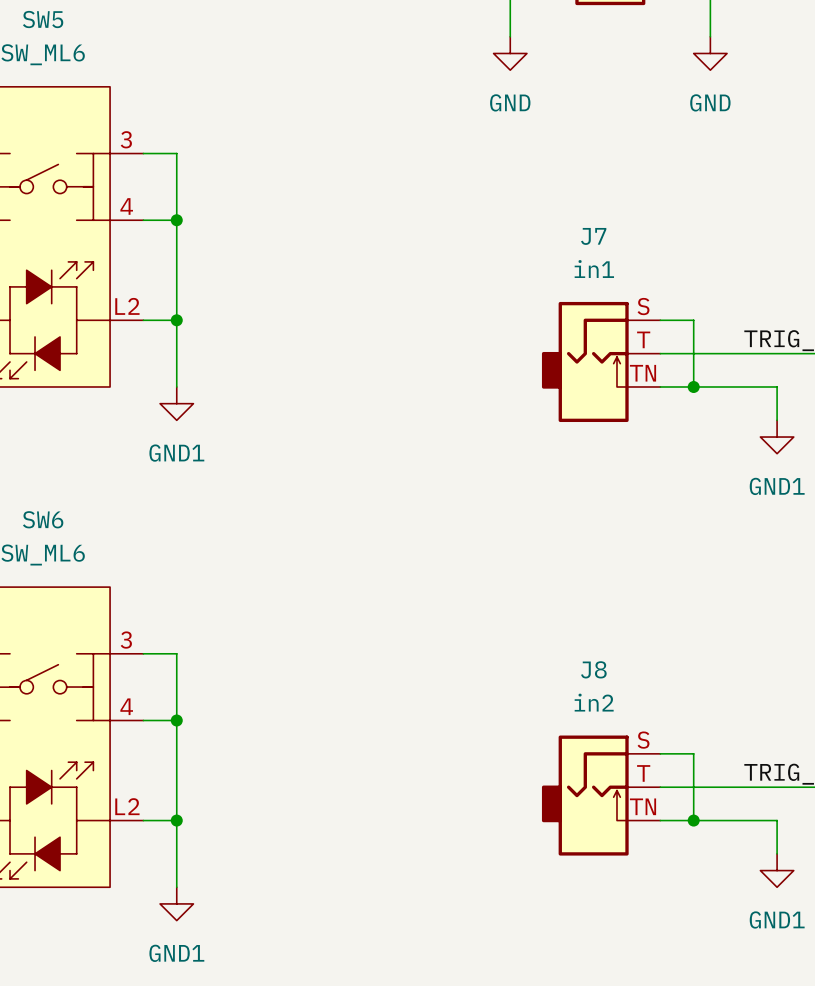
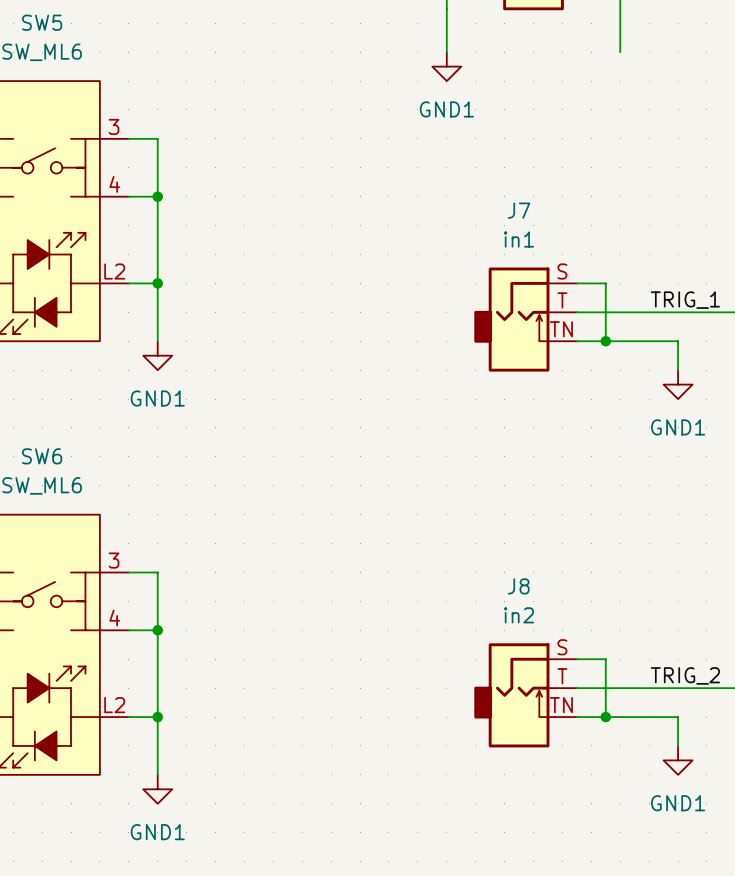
power symbol: GND (510, 53) -> none
power symbol: GND (710, 53) -> none
power symbol: none -> GND1 (446, 66)

